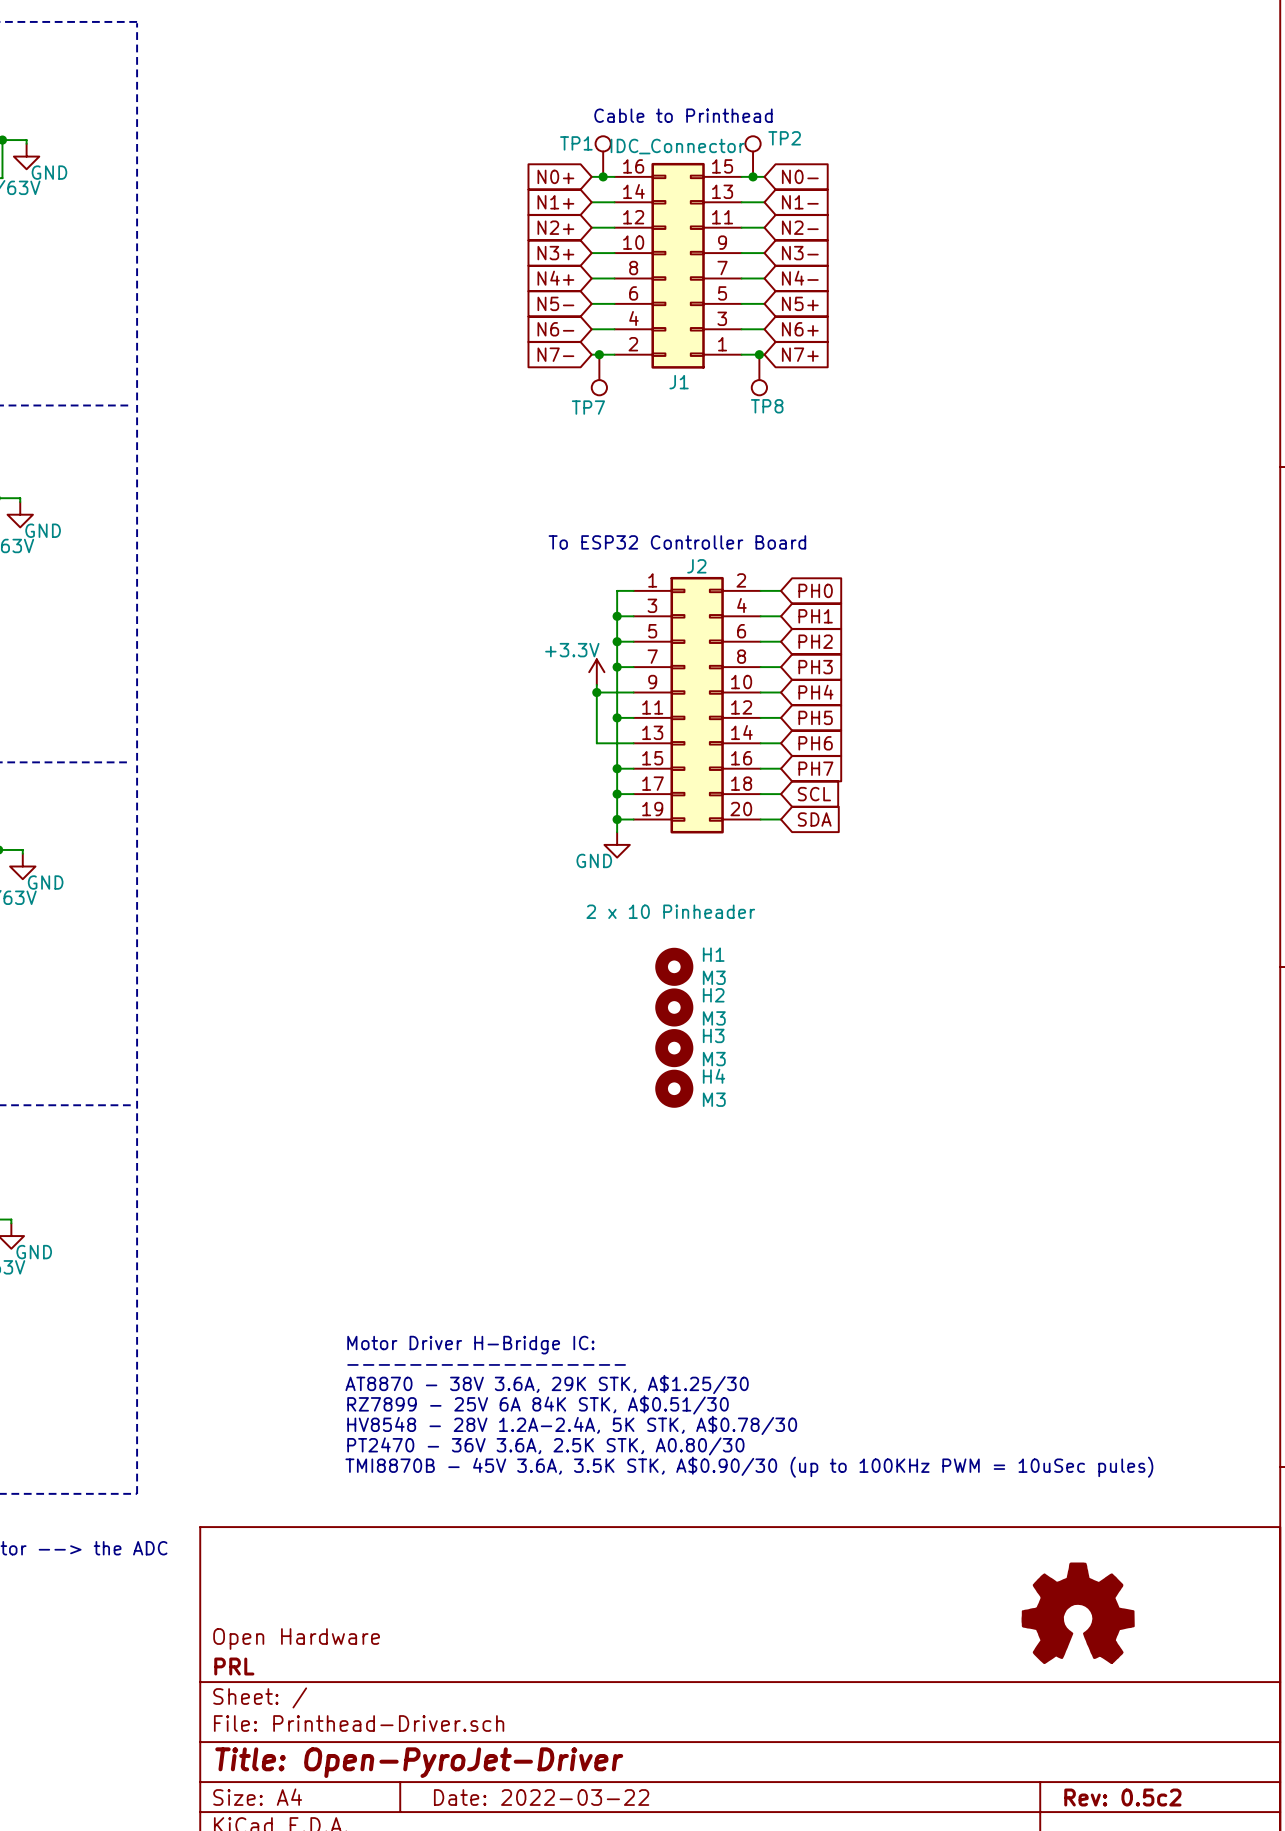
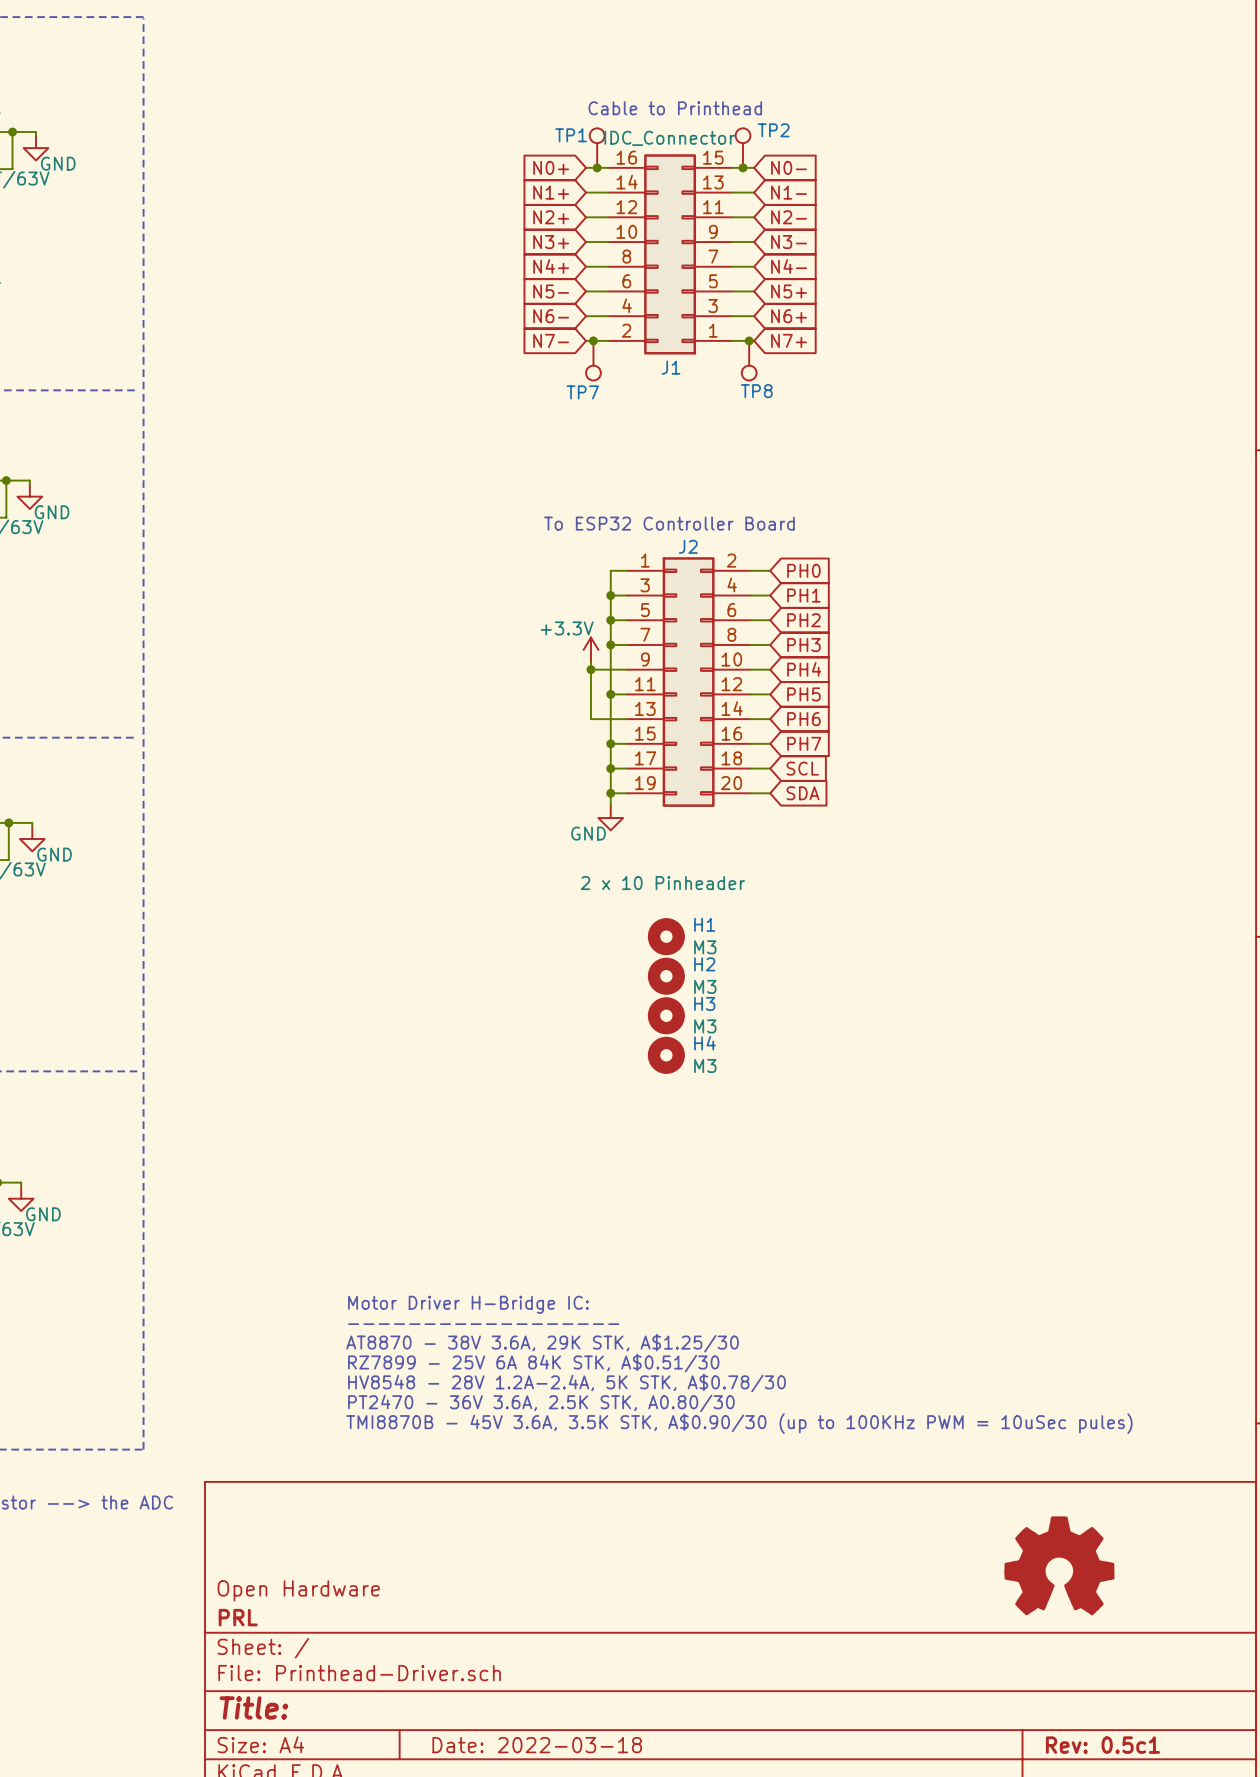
title block: Title: Open-PyroJet-Driver (419, 1762) -> Title: (253, 1707)
title block: Date: 2022-03-22 (541, 1797) -> Date: 2022-03-18 (537, 1745)
title block: Rev: 0.5c2 (1122, 1797) -> Rev: 0.5c1 (1102, 1745)

